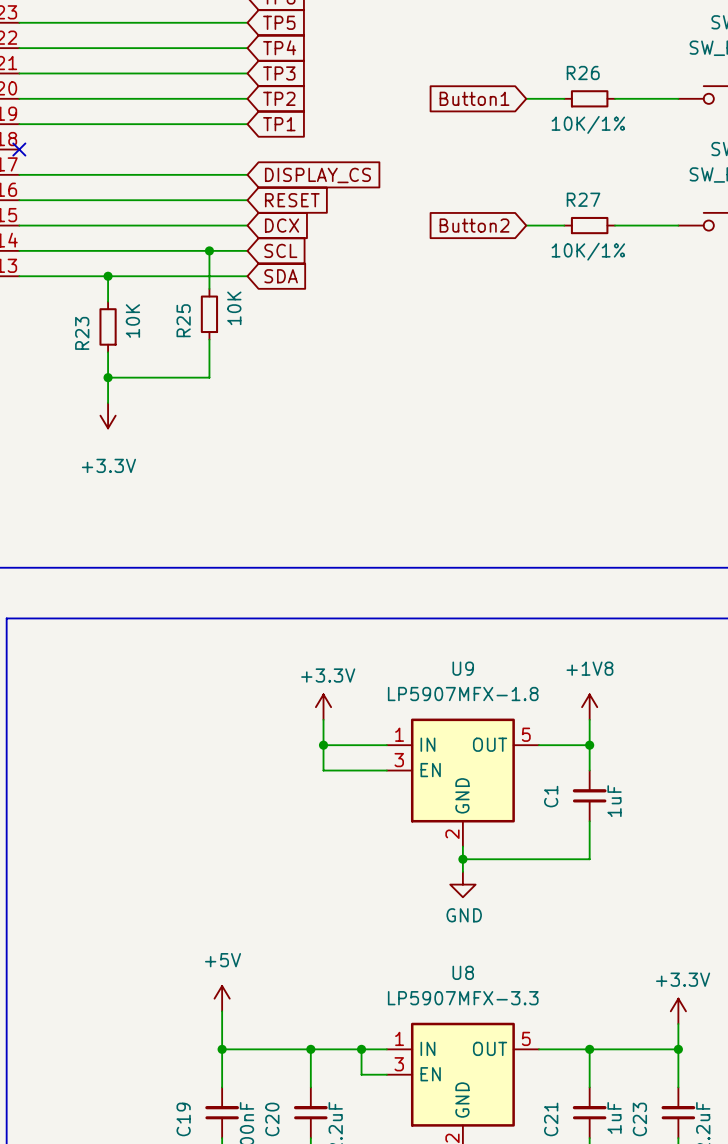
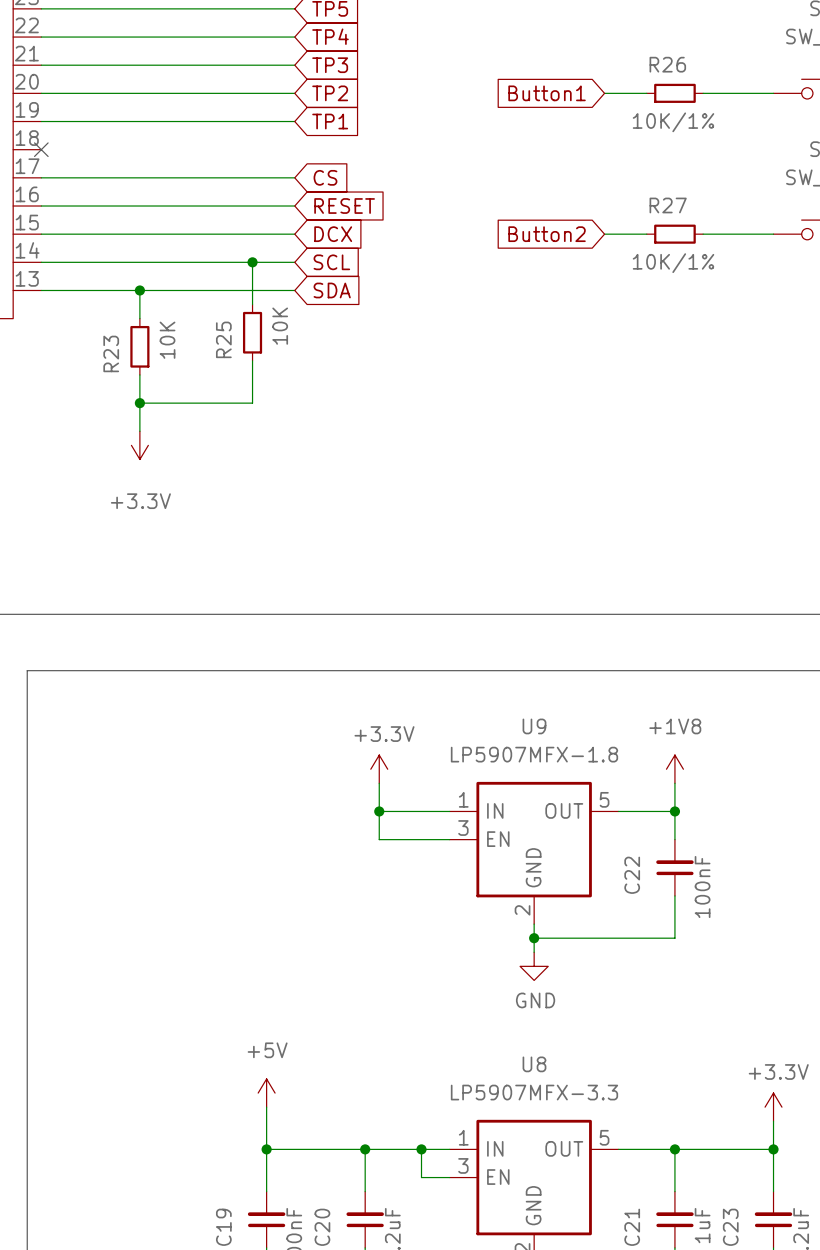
global label: DISPLAY_CS (317, 175) -> CS (325, 177)
C1 name: C1 (551, 796) -> C22 (632, 875)
C1 value: 1uF (614, 801) -> 100nF (702, 887)

